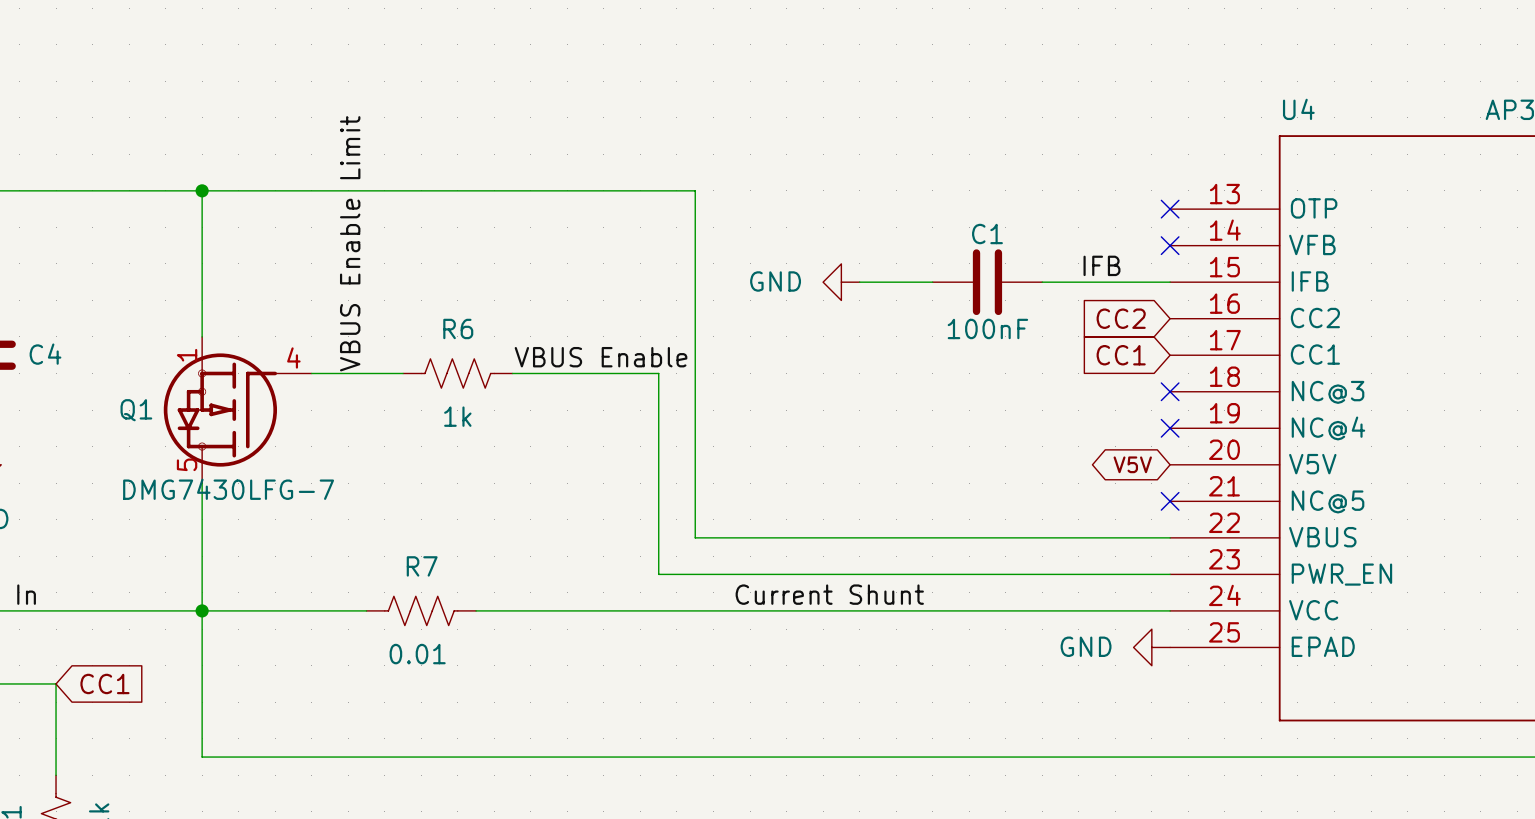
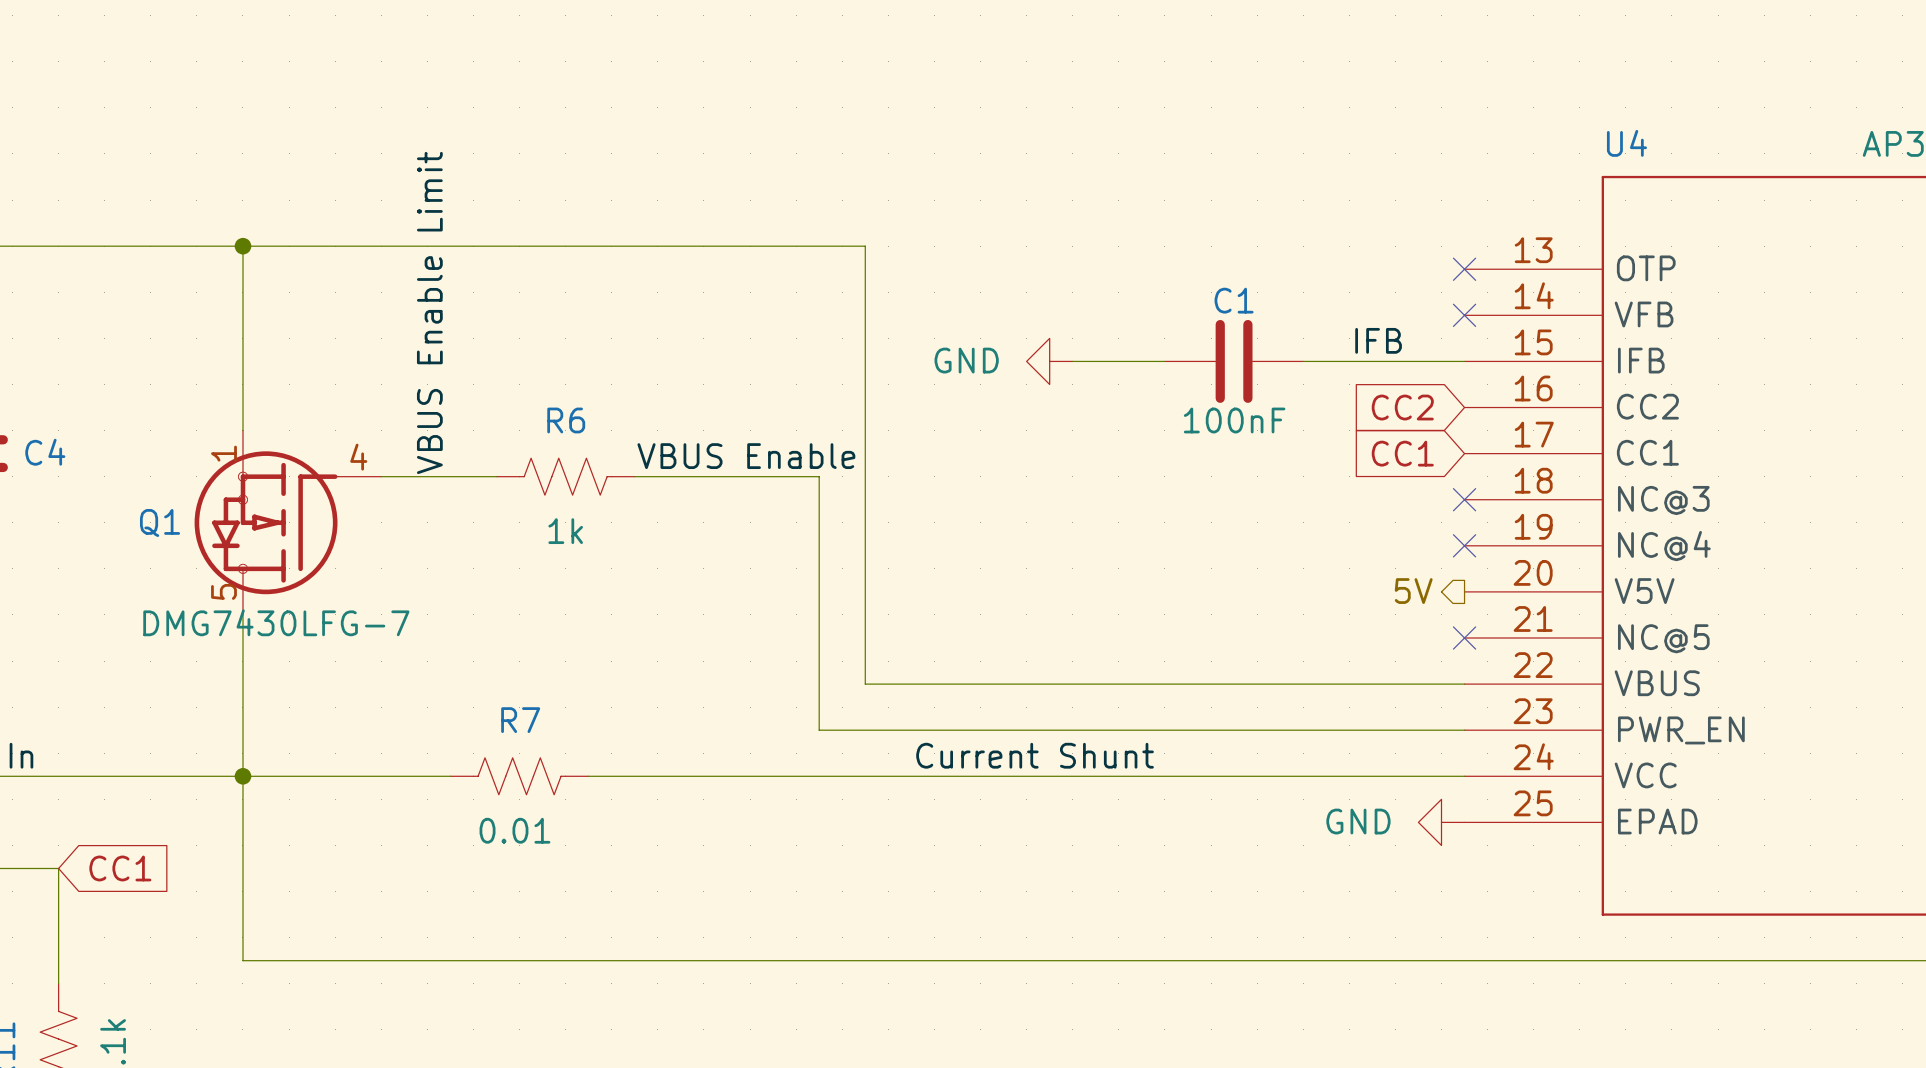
hierarchical label: none -> 5V (1413, 591)
global label: V5V (1132, 464) -> none

